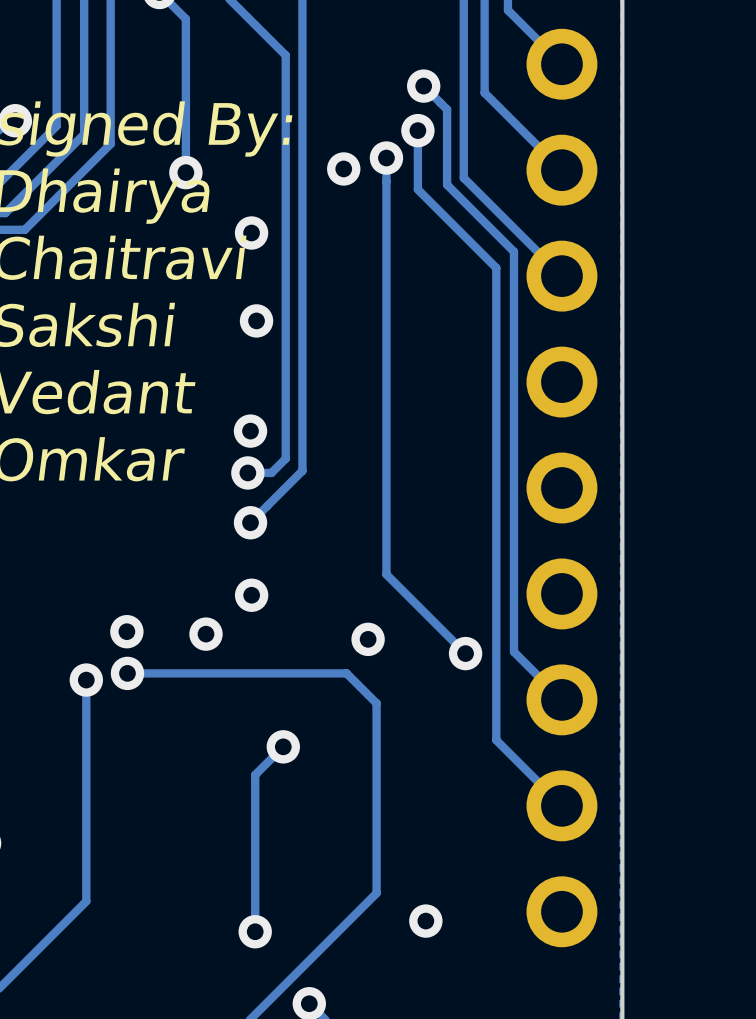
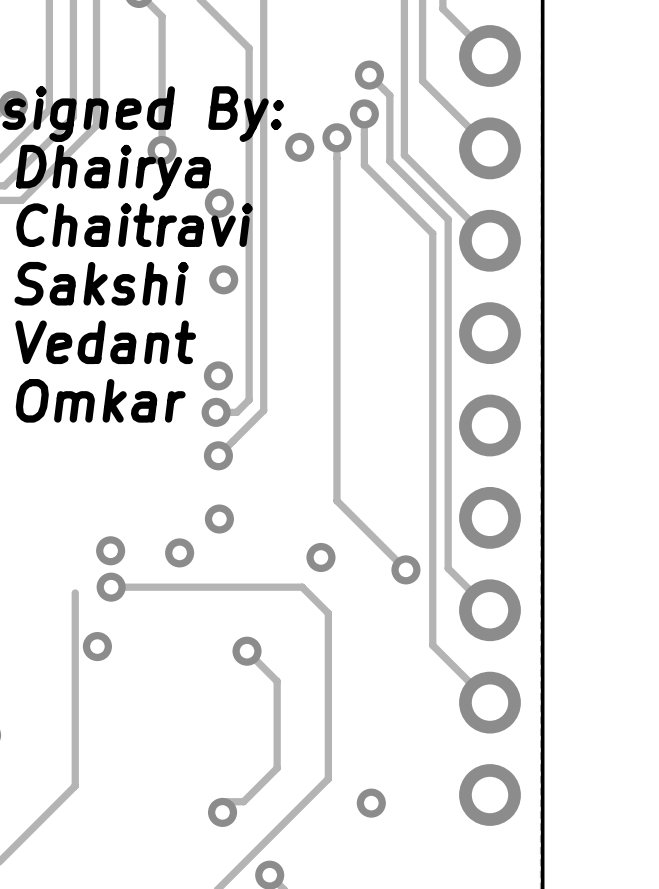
via position: (86, 680) -> (97, 646)
track: (283, 746) (255, 774) (255, 931) -> (247, 651) (277, 681) (277, 768) (243, 801) (223, 801)

